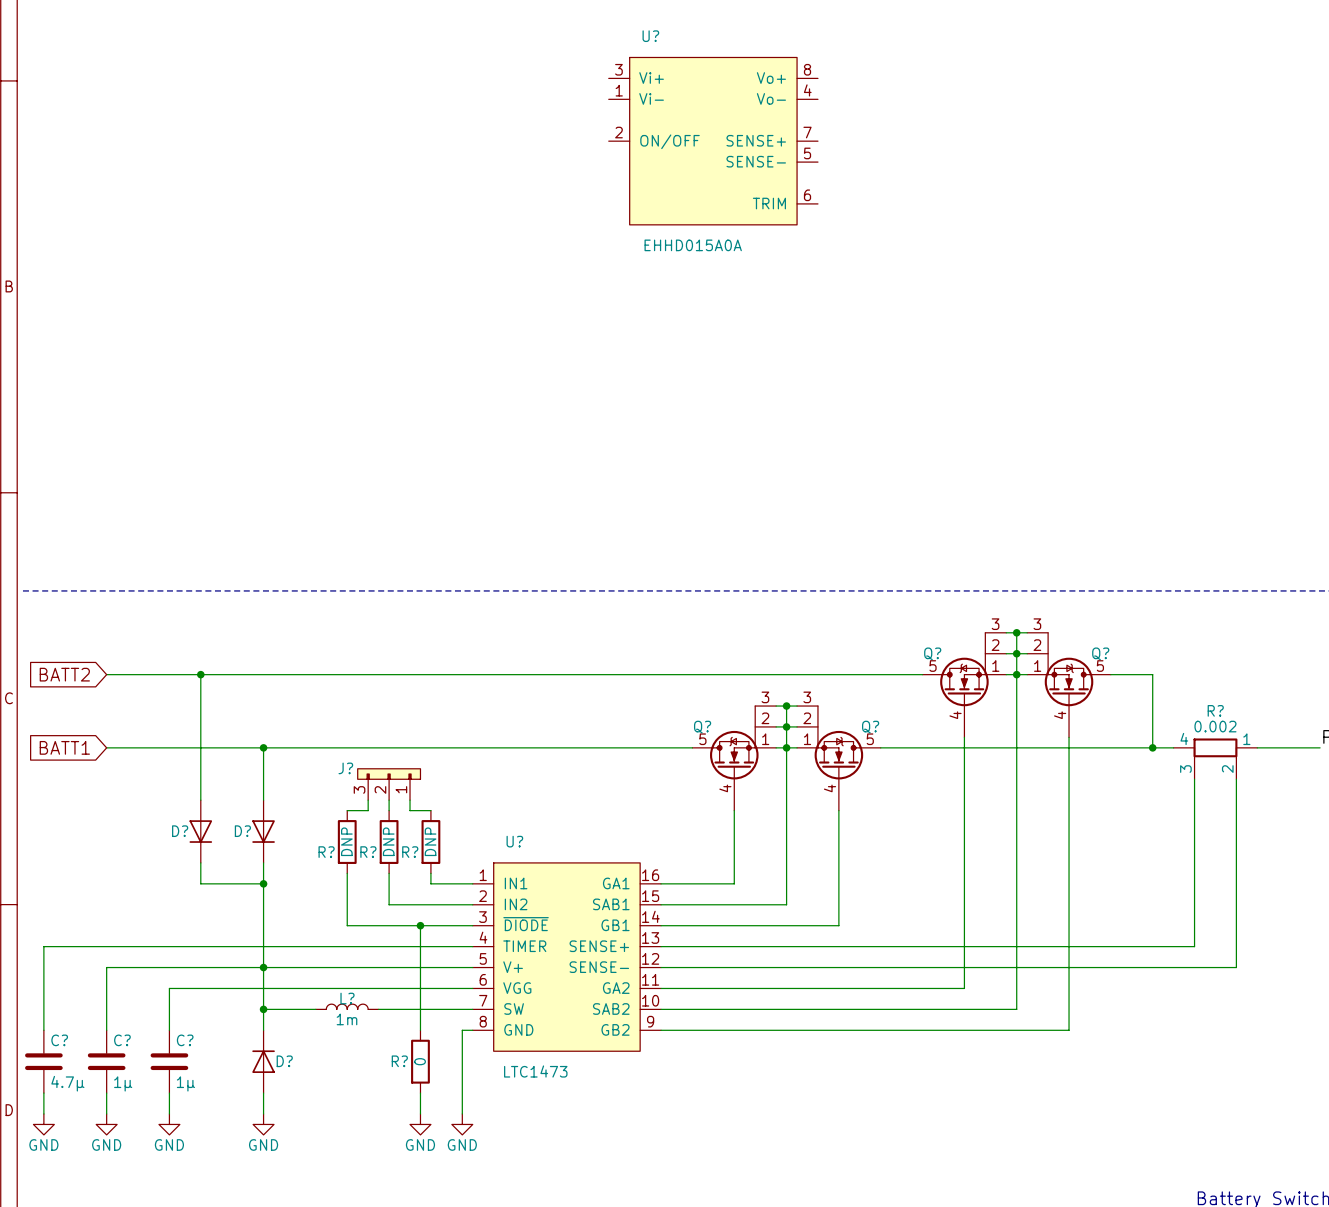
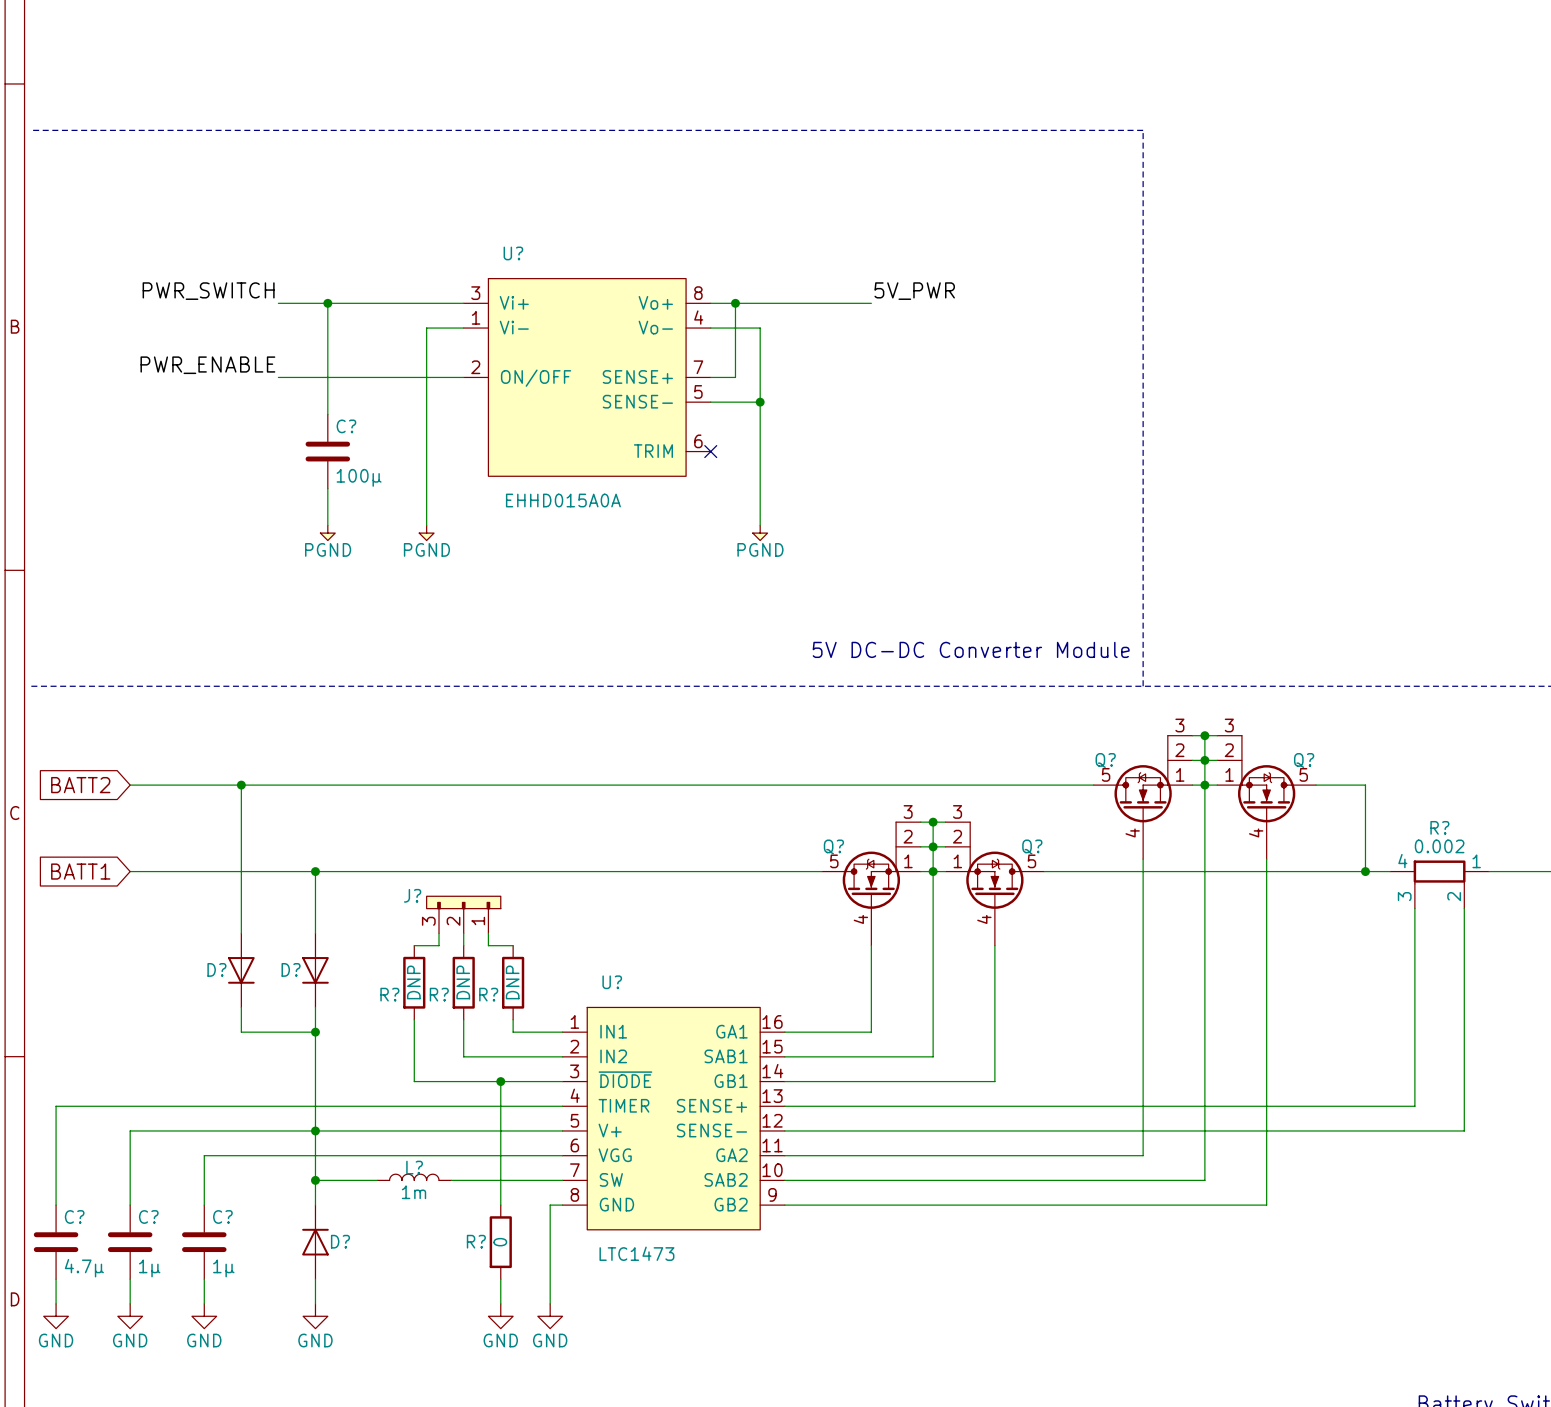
line: none -> (31, 130) (1143, 130) (1143, 686)
U?: EHHD015A0A (713, 141) -> none
label: none -> PWR_SWITCH (208, 291)
label: none -> 5V_PWR (914, 291)
wire: none -> (278, 303) (463, 303)
wire: none -> (327, 303) (327, 414)
junction: none -> (327, 303)
wire: none -> (710, 303) (871, 303)
wire: none -> (735, 303) (735, 377) (710, 377)
junction: none -> (735, 303)
wire: none -> (463, 328) (426, 328) (426, 525)
wire: none -> (710, 328) (760, 328) (760, 525)
label: none -> PWR_ENABLE (207, 365)
wire: none -> (278, 377) (463, 377)
U?: none -> EHHD015A0A (587, 377)
wire: none -> (710, 402) (760, 402)
junction: none -> (760, 402)
C?: none -> 100μ (327, 451)
no-connect mark: none -> (710, 451)
wire: none -> (327, 488) (327, 525)
power symbol: none -> PGND (327, 533)
power symbol: none -> PGND (426, 533)
power symbol: none -> PGND (760, 533)
text: none -> 5V DC-DC Converter Module (971, 649)

